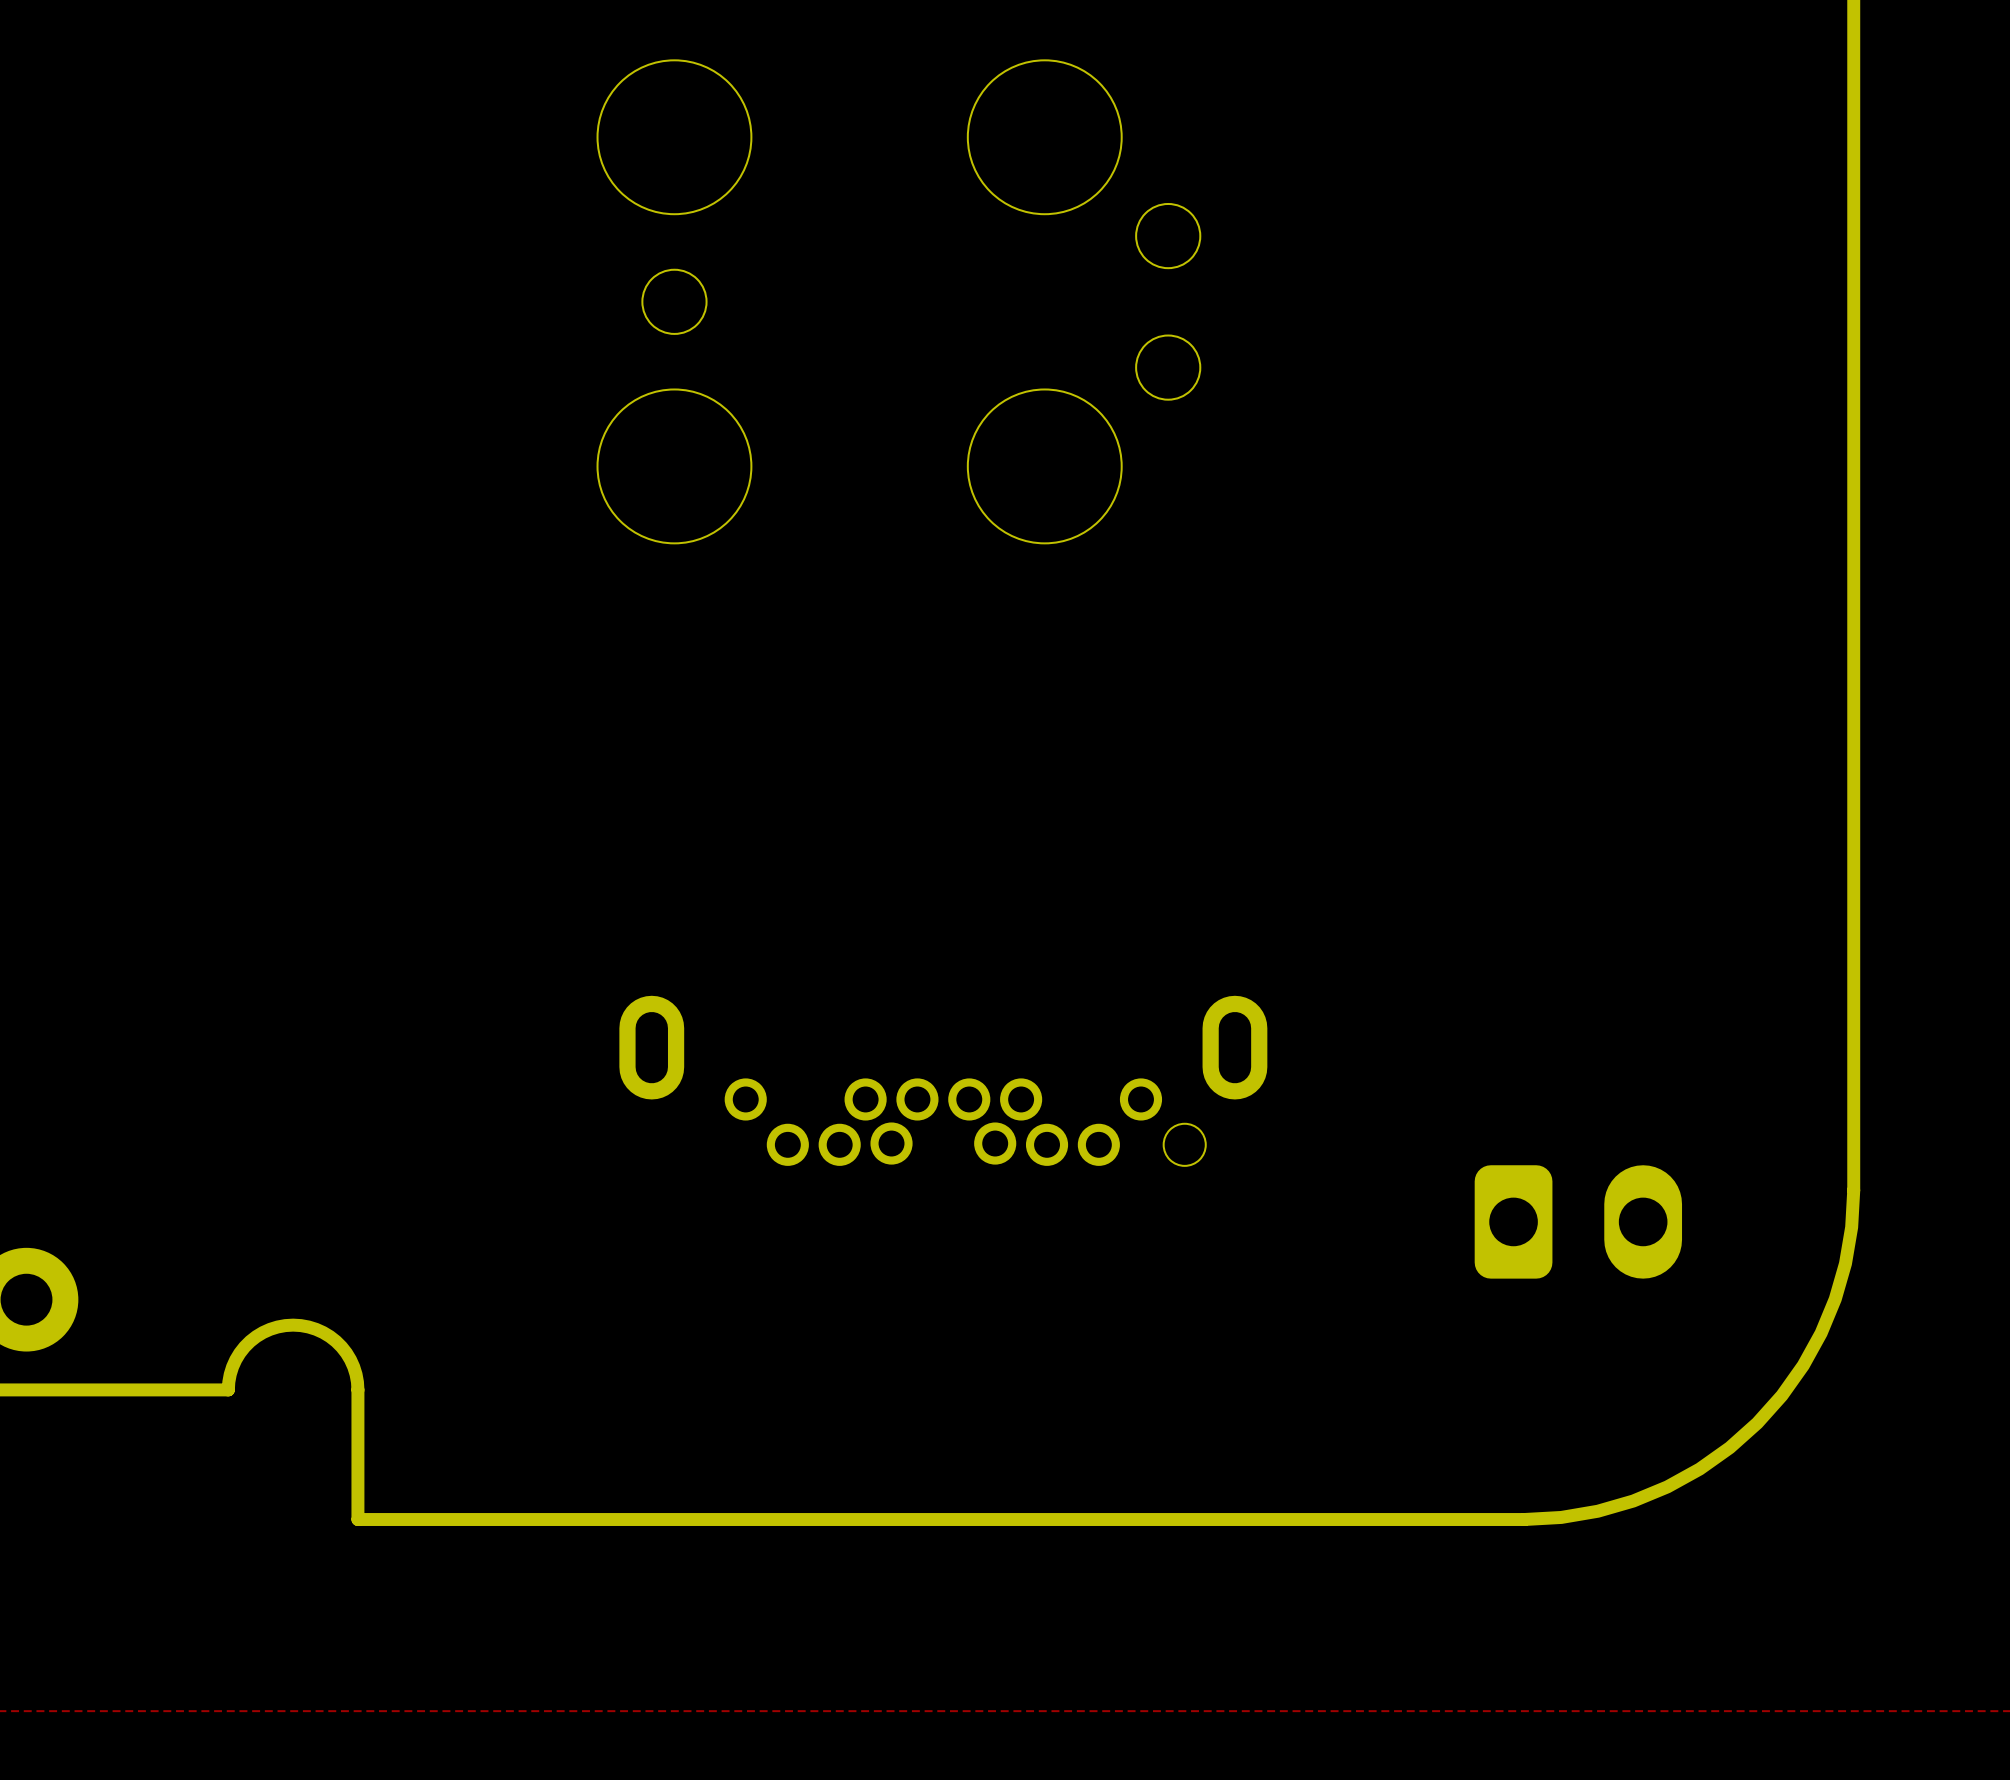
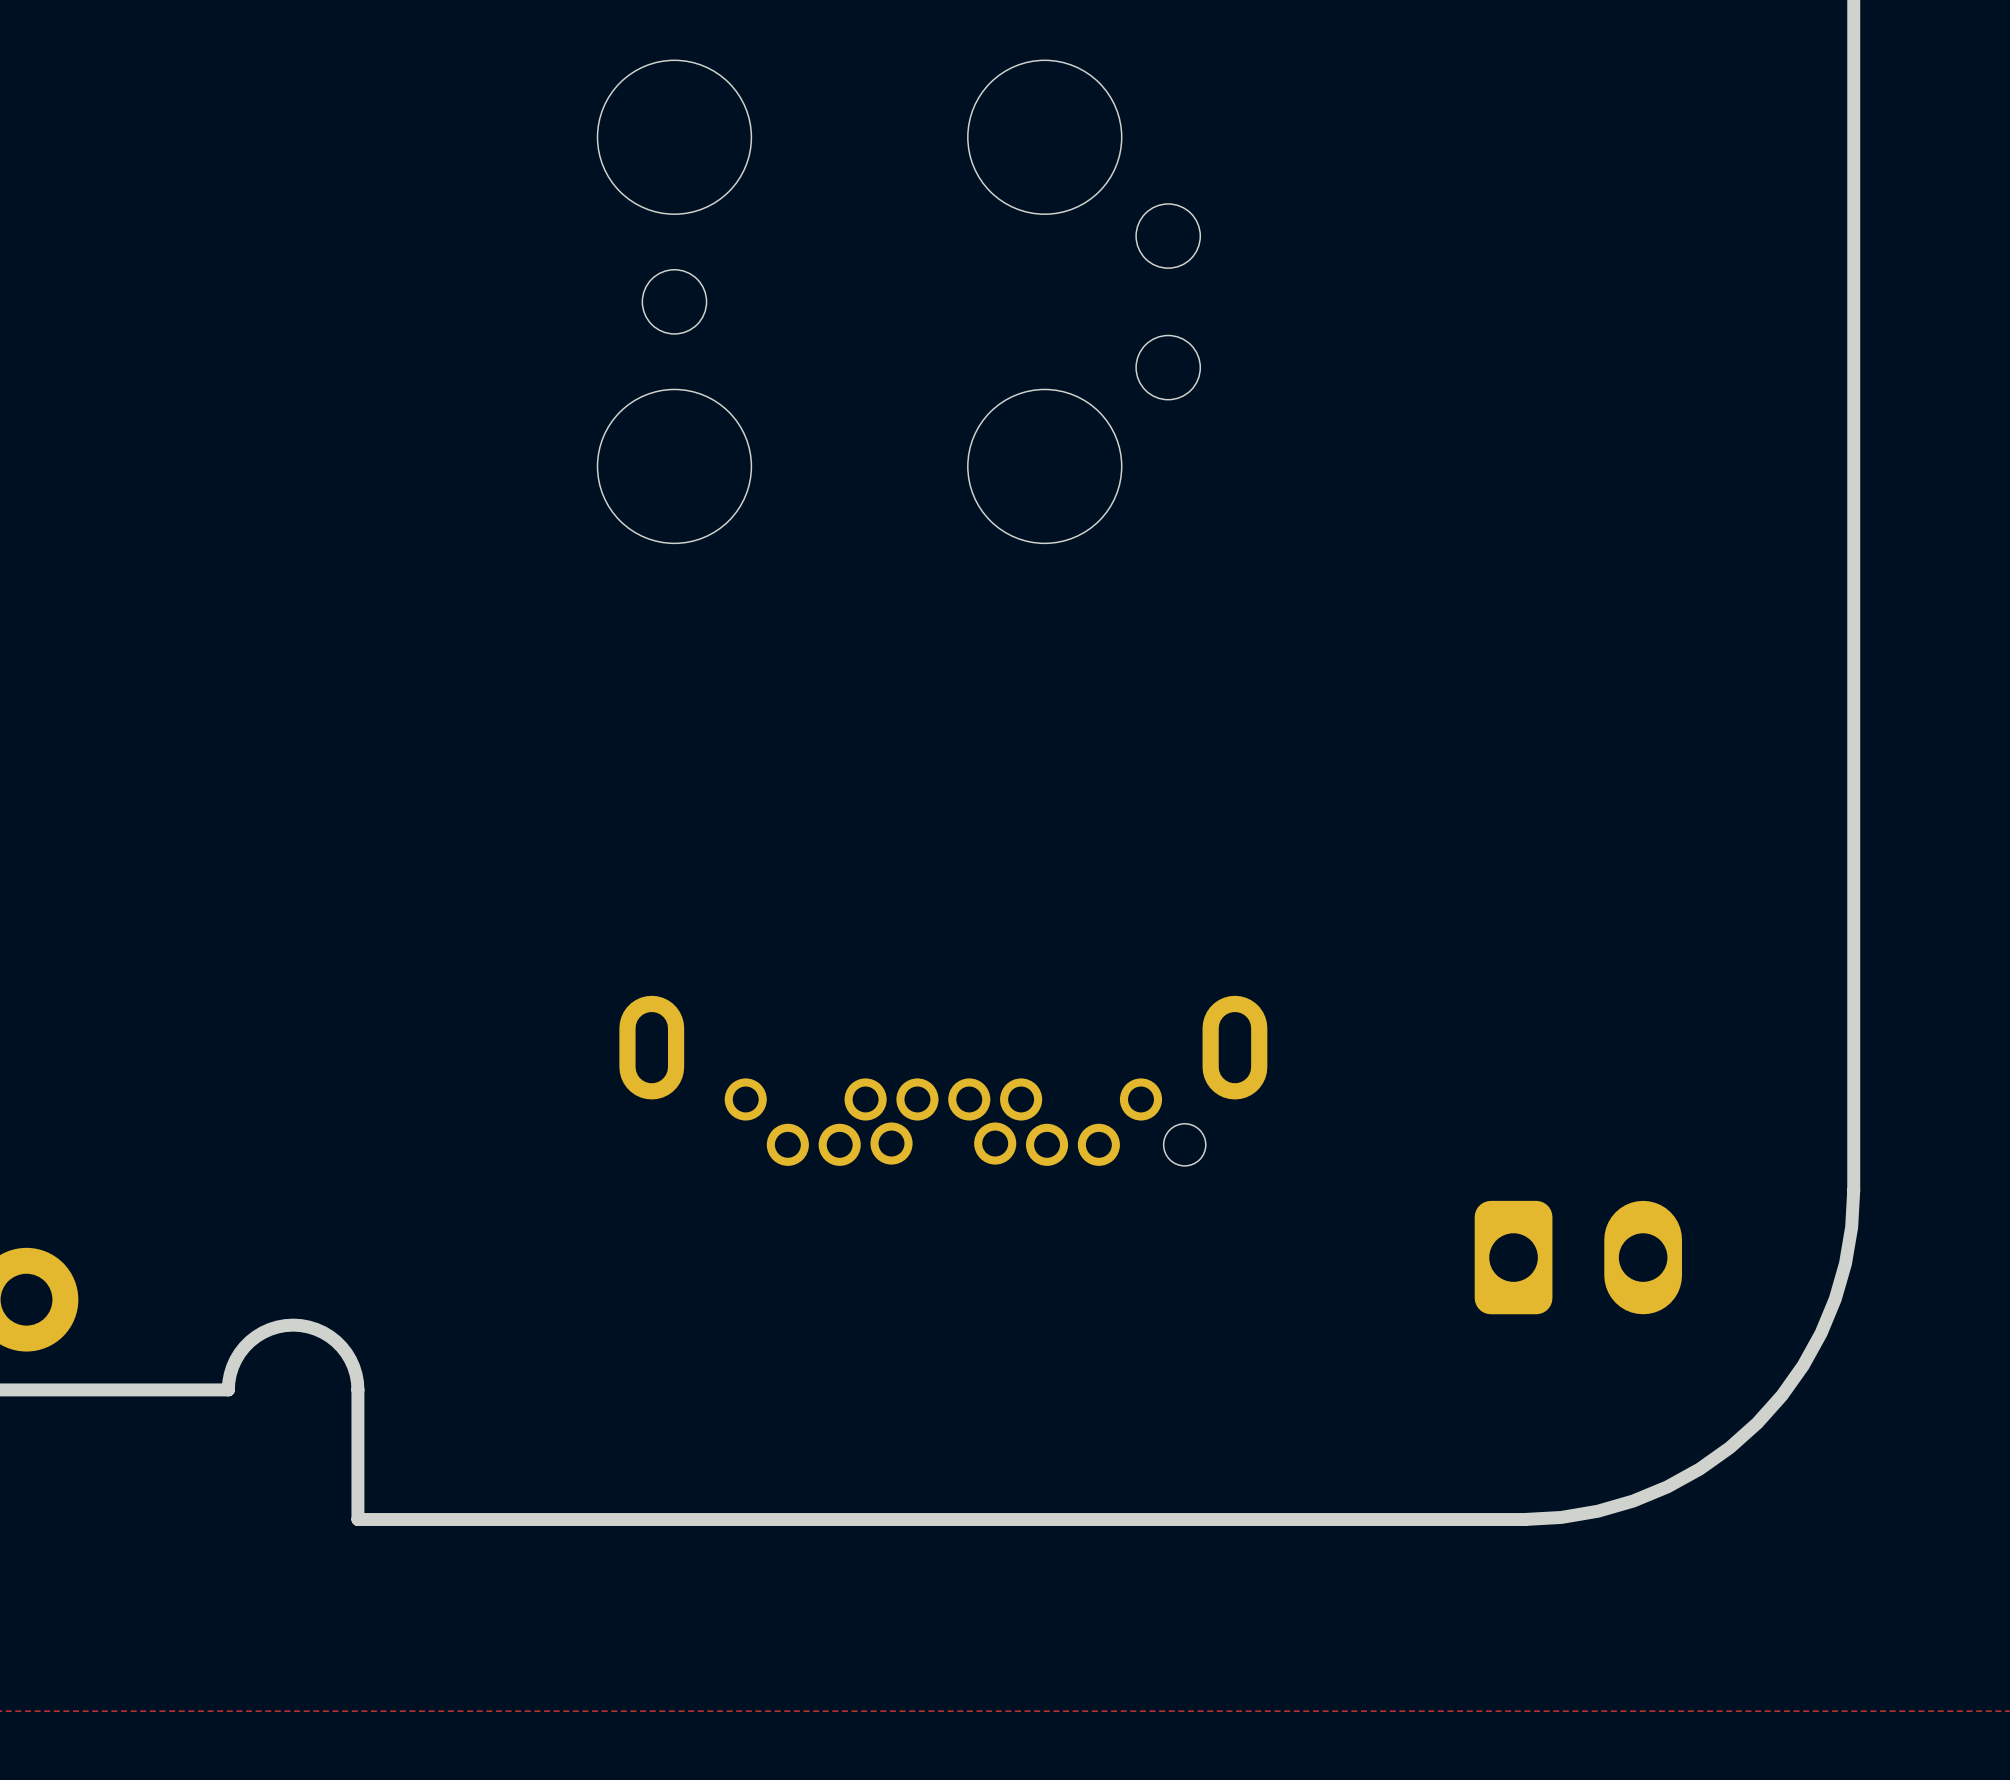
part position: (1578, 1221) -> (1578, 1257)

